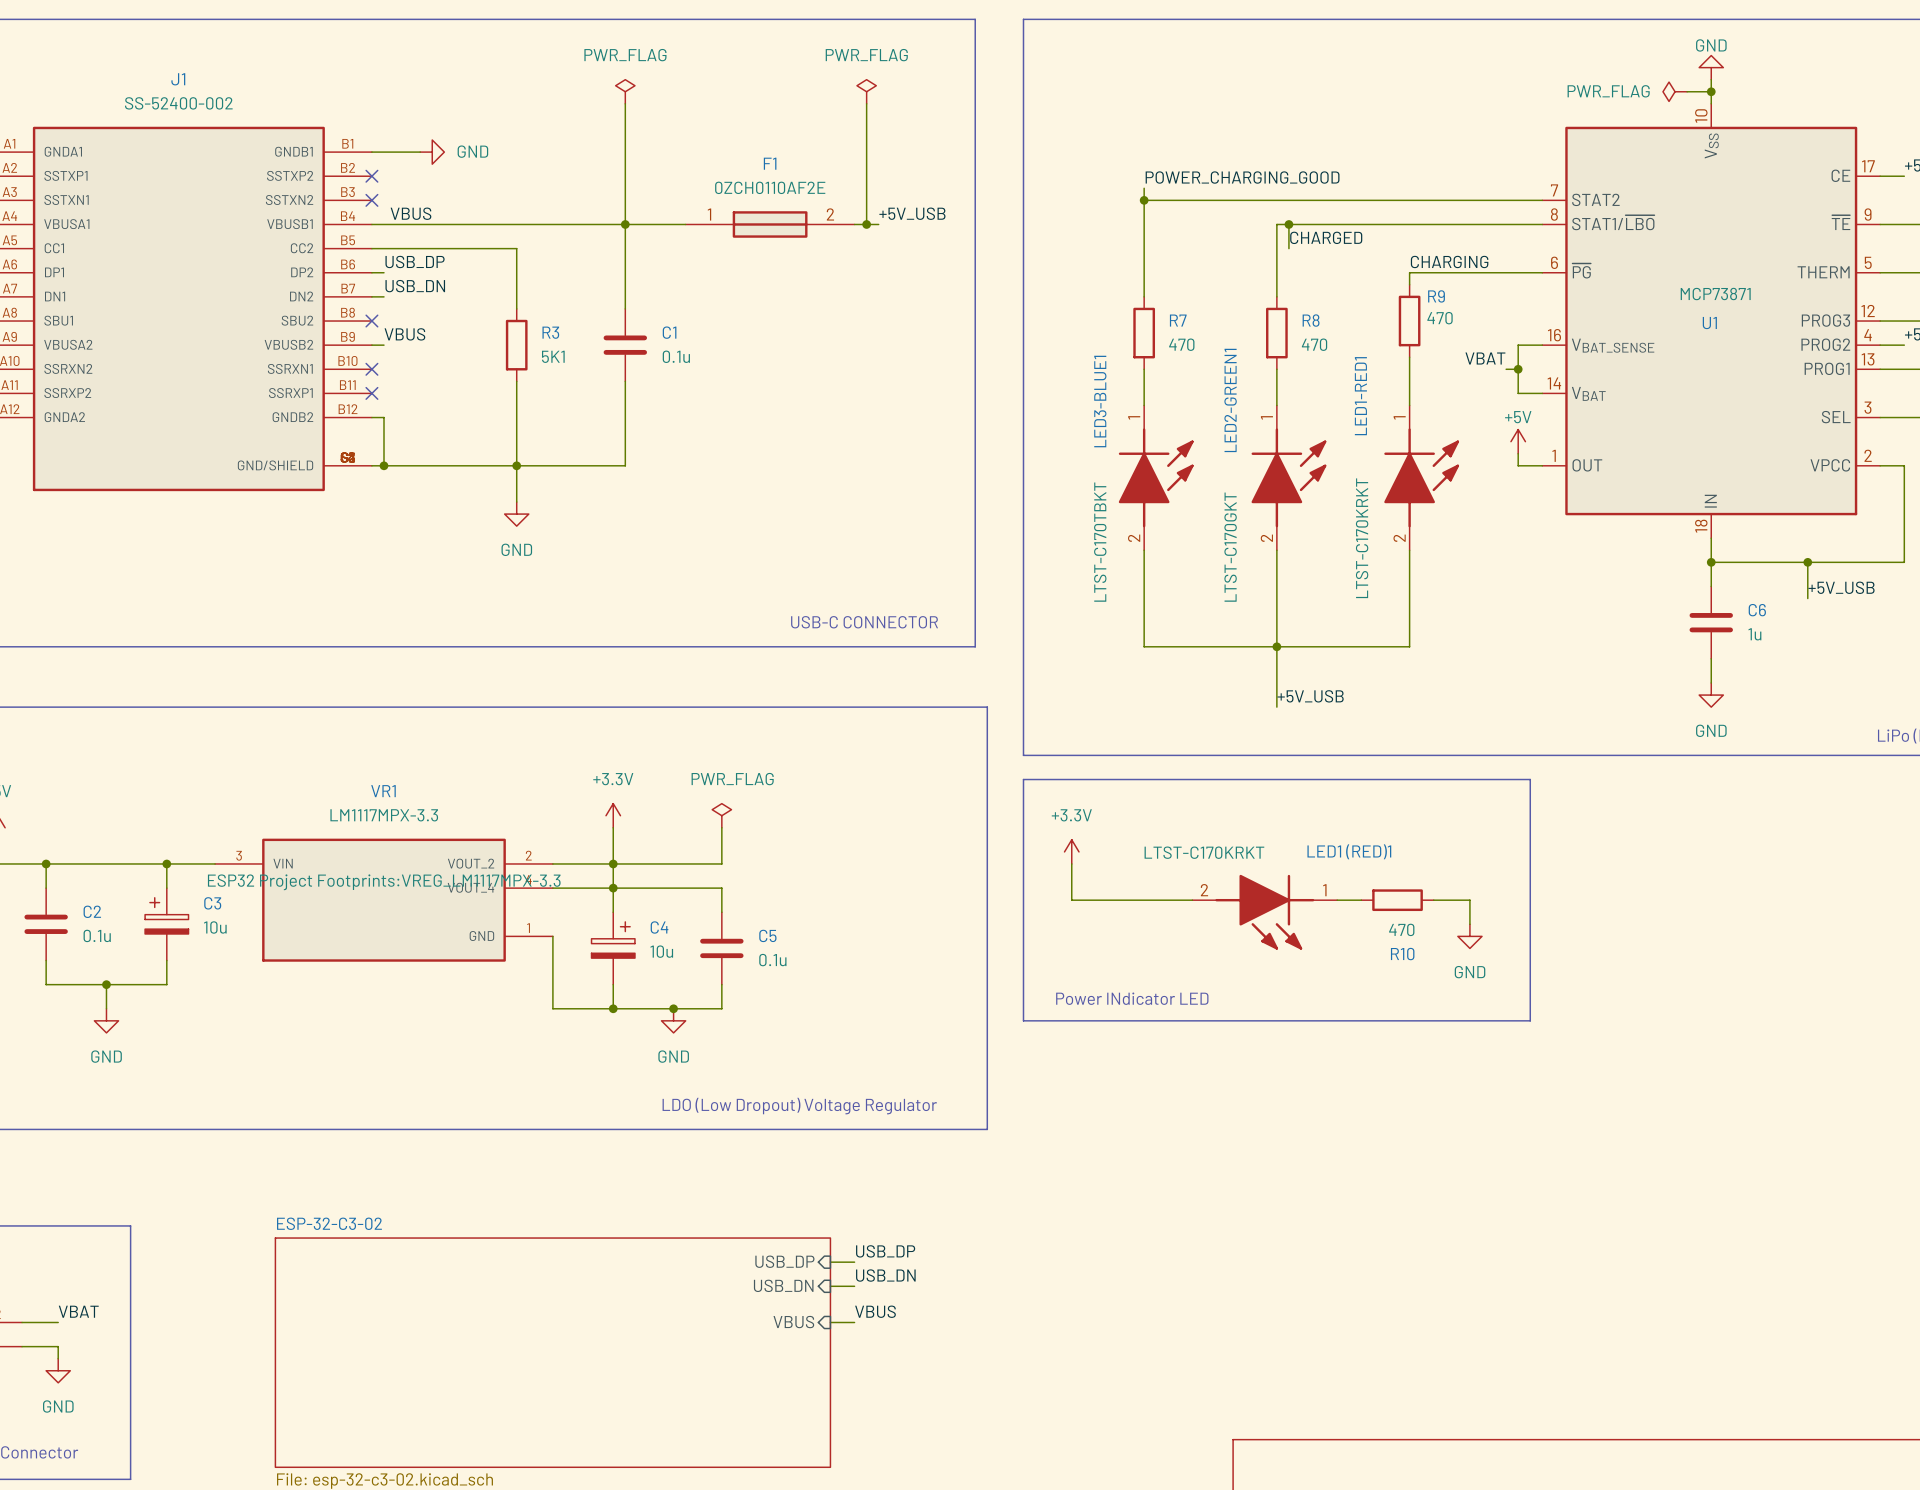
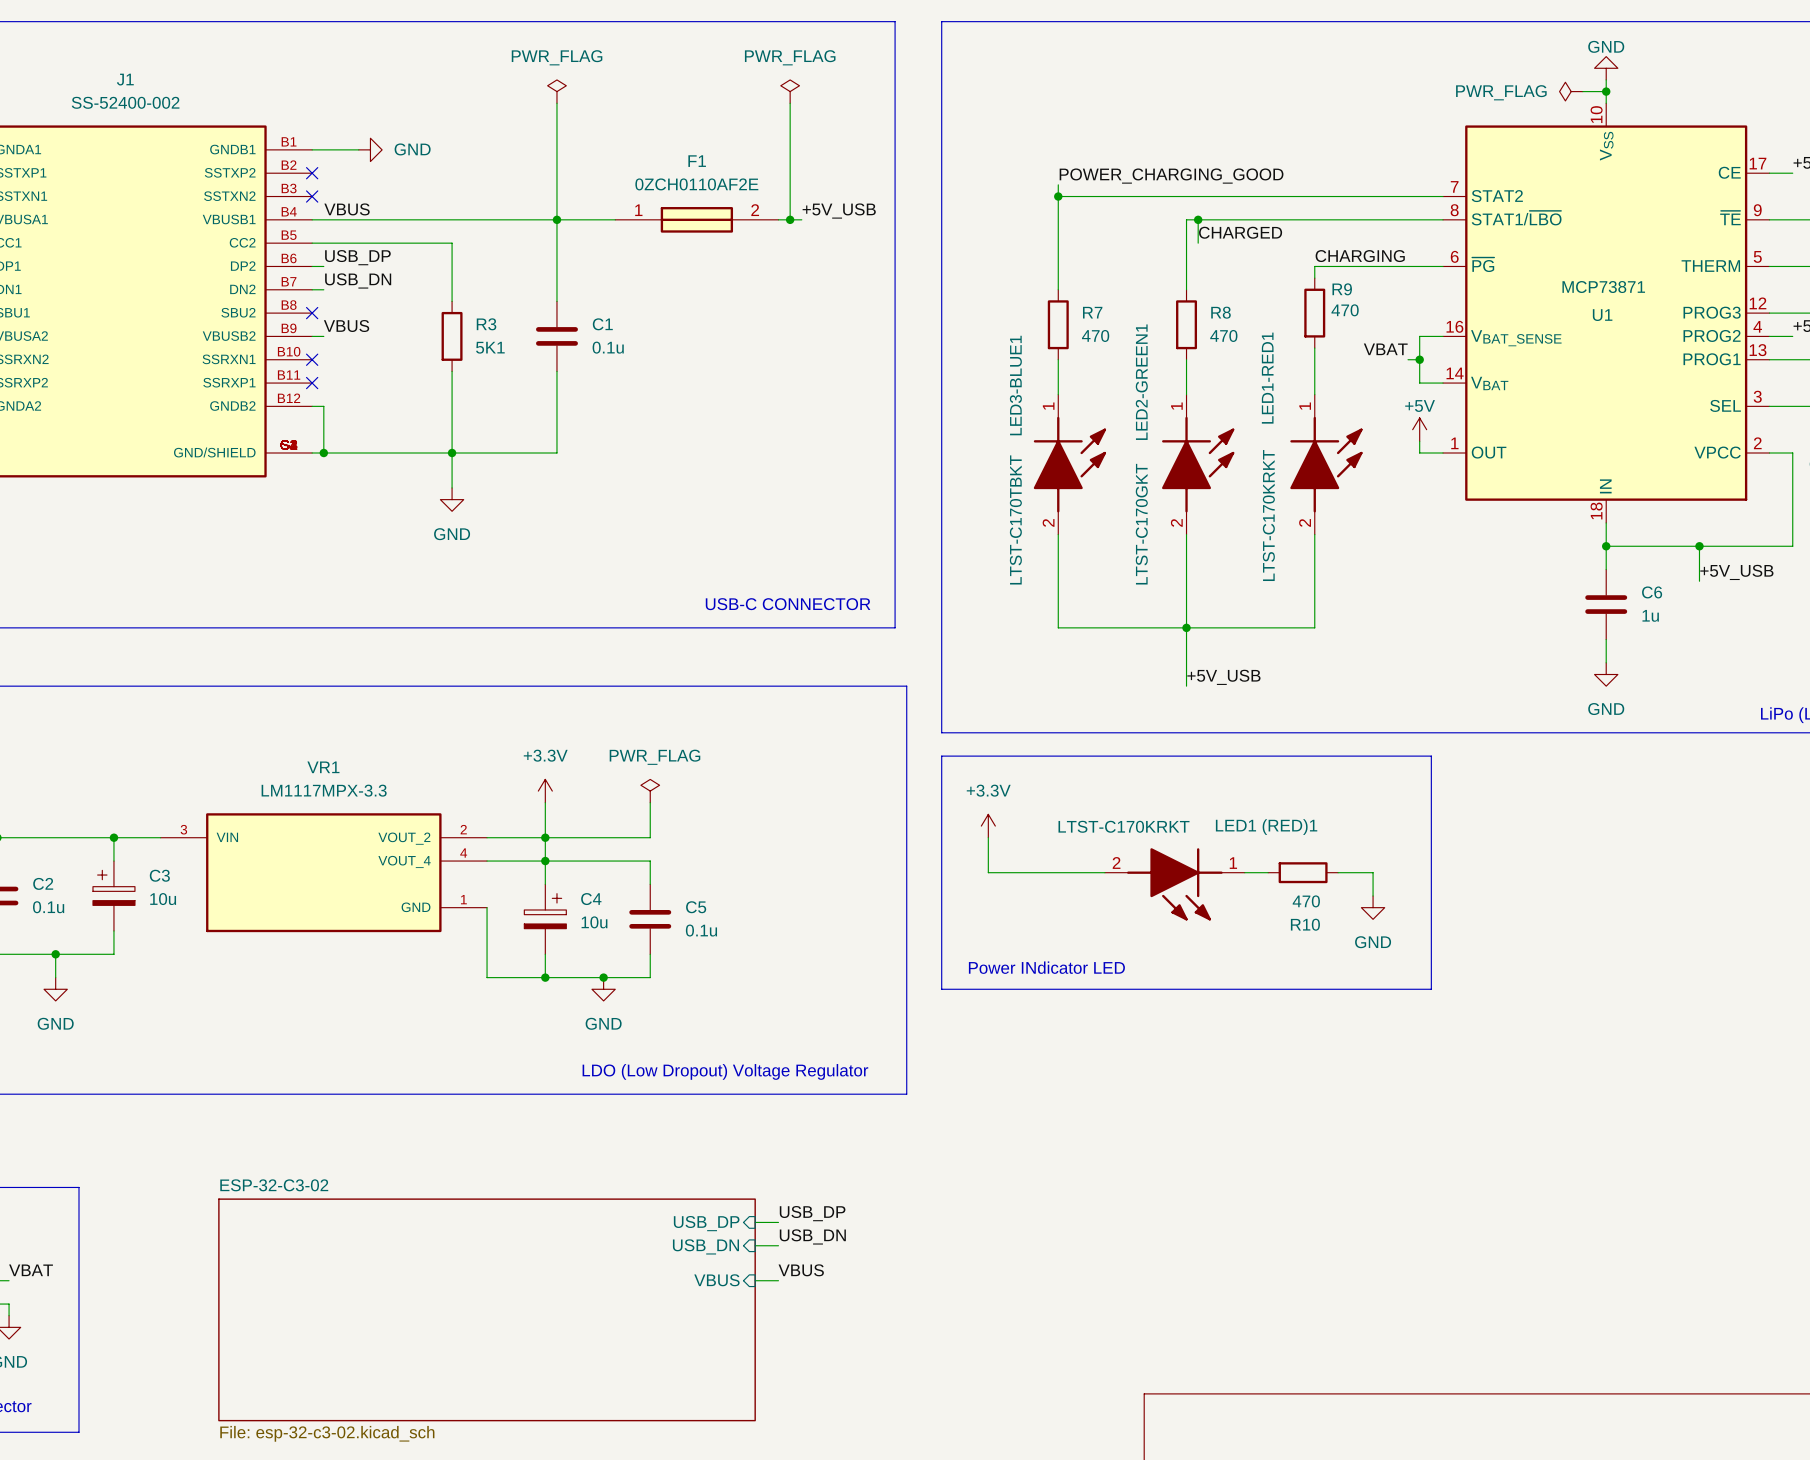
VR1 text: ESP32 Project Footprints:VREG_LM1117MPX-3.3 (384, 882) -> none

